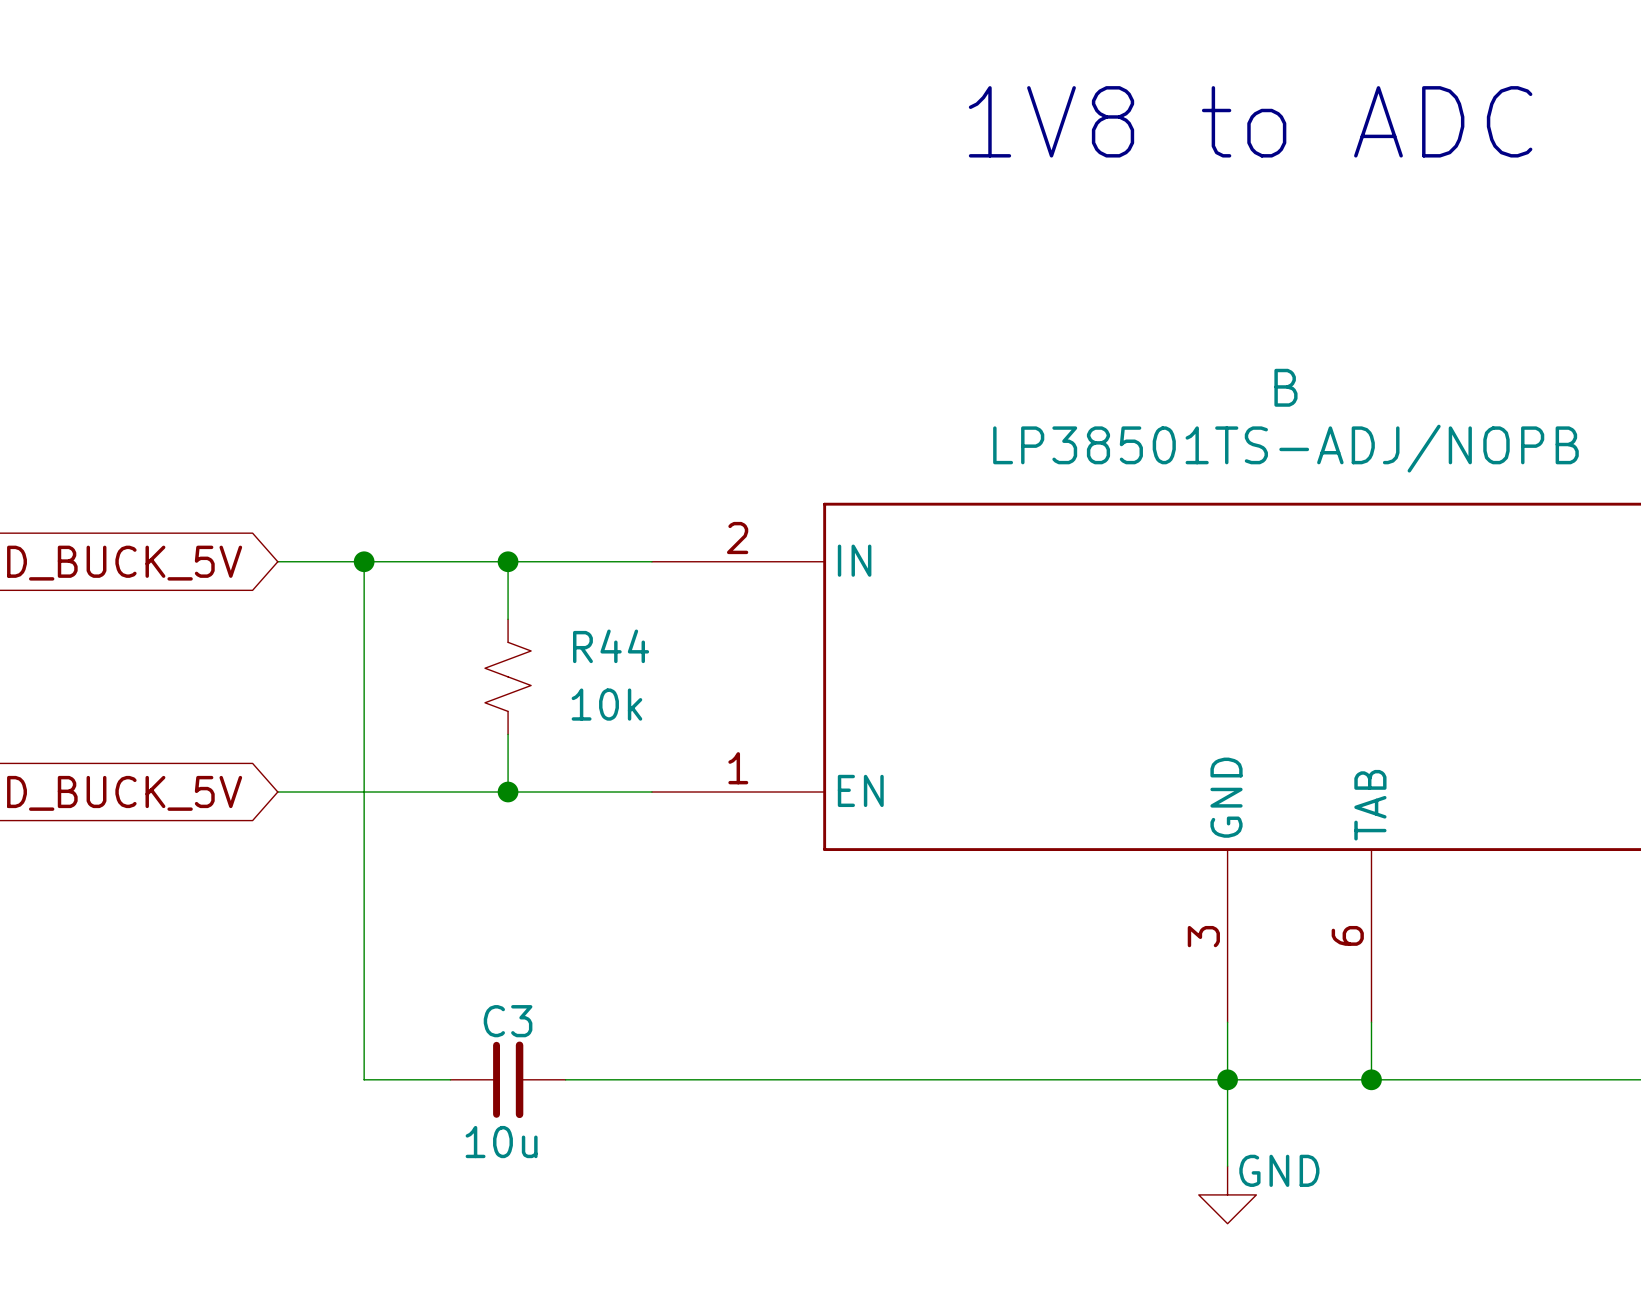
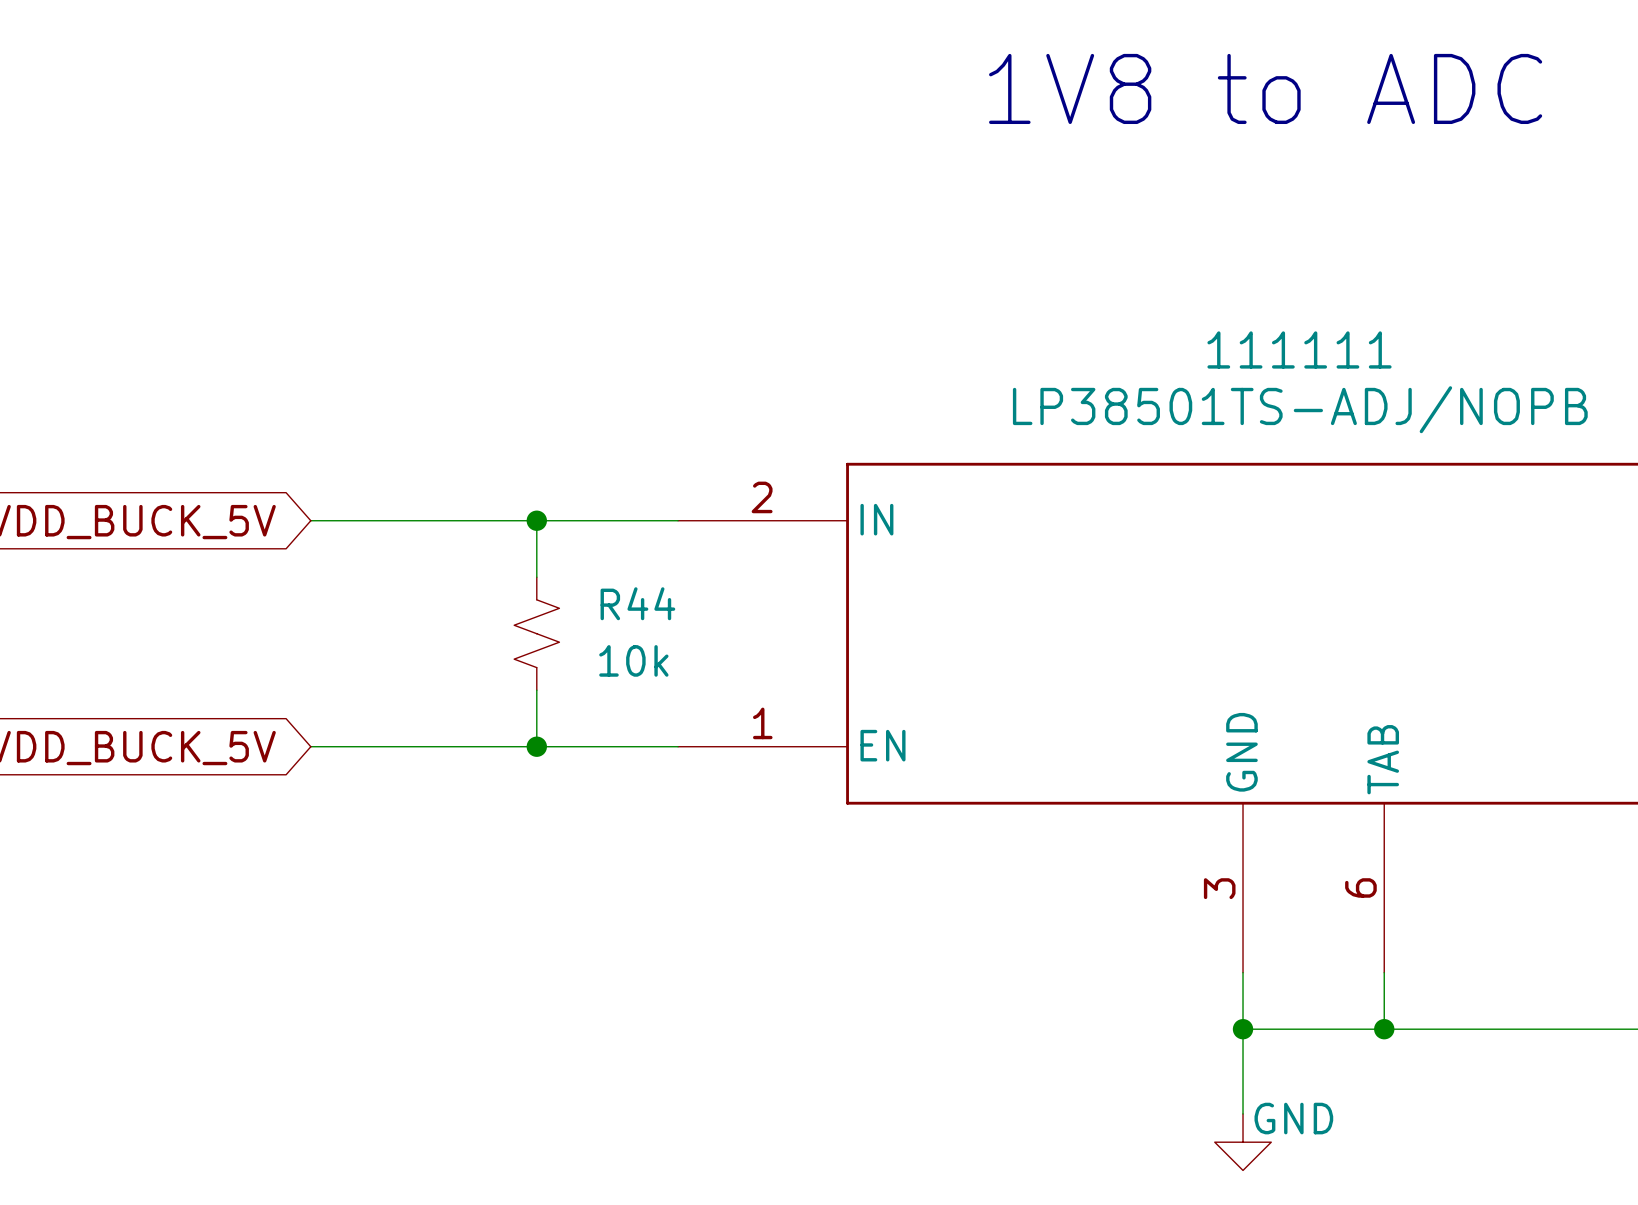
B name: B (1285, 387) -> 111111 (1299, 349)
wire: (364, 561) (364, 1079) (450, 1079) -> none
junction: (364, 561) -> none
C3: 10u (508, 1079) -> none
wire: (565, 1079) (1227, 1079) -> none

